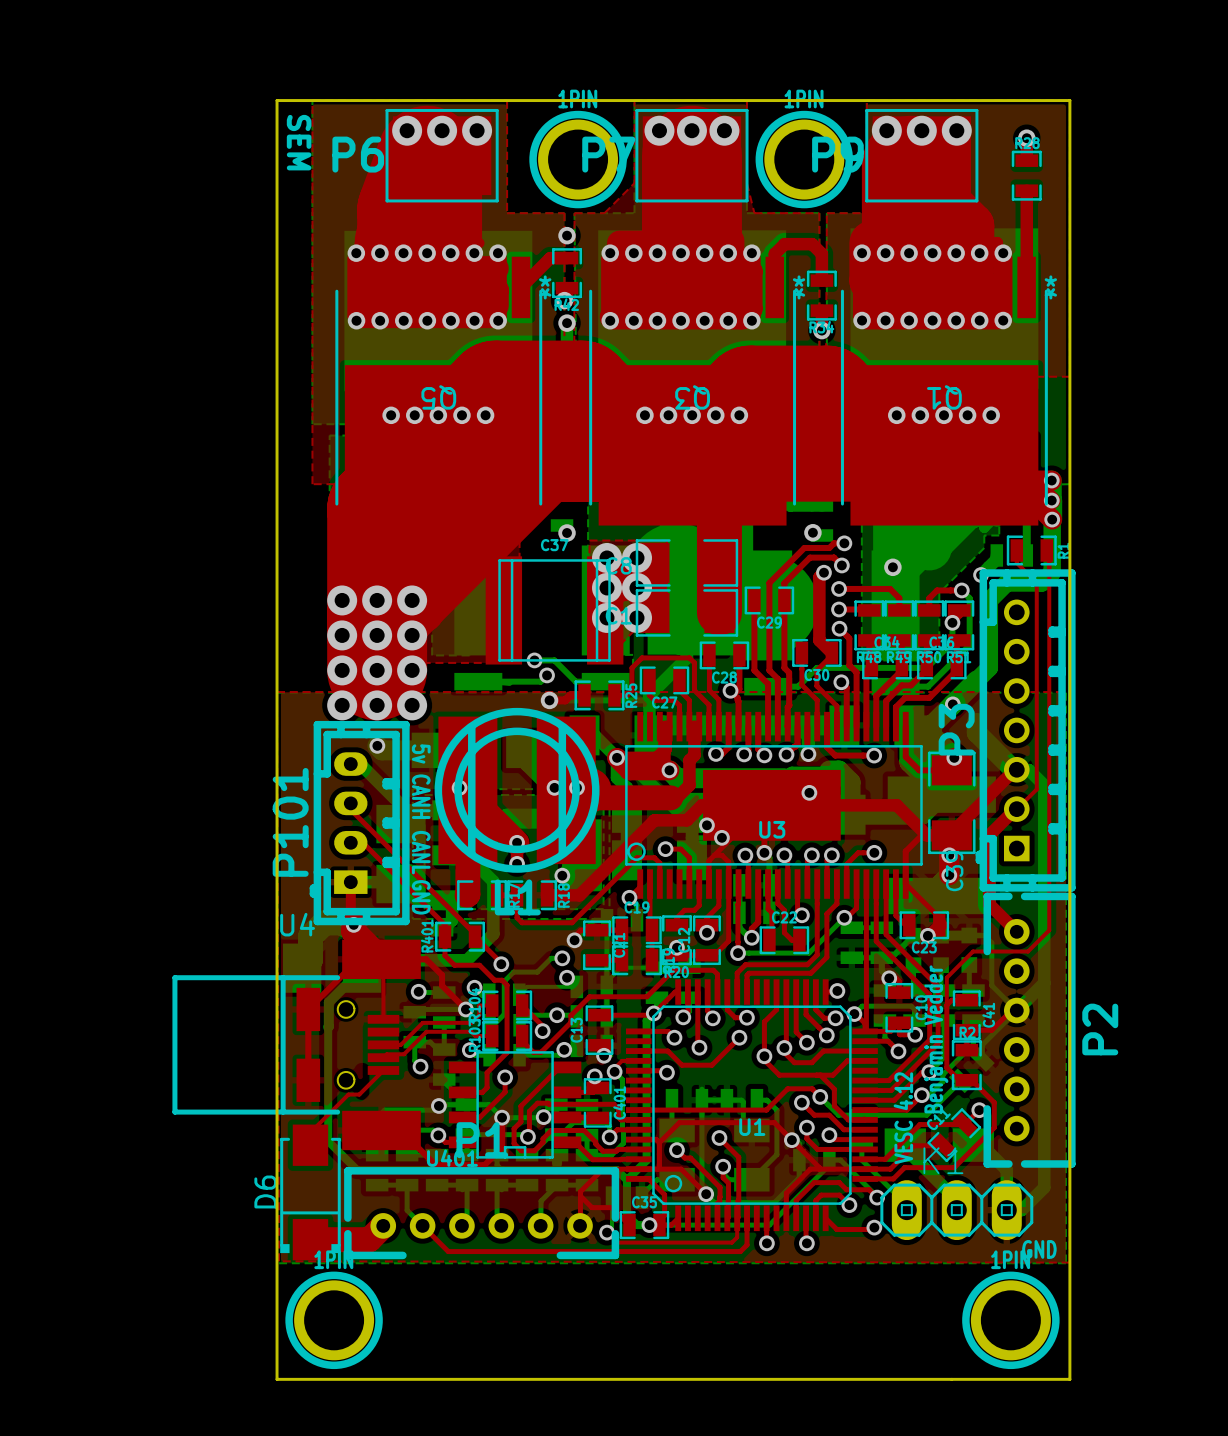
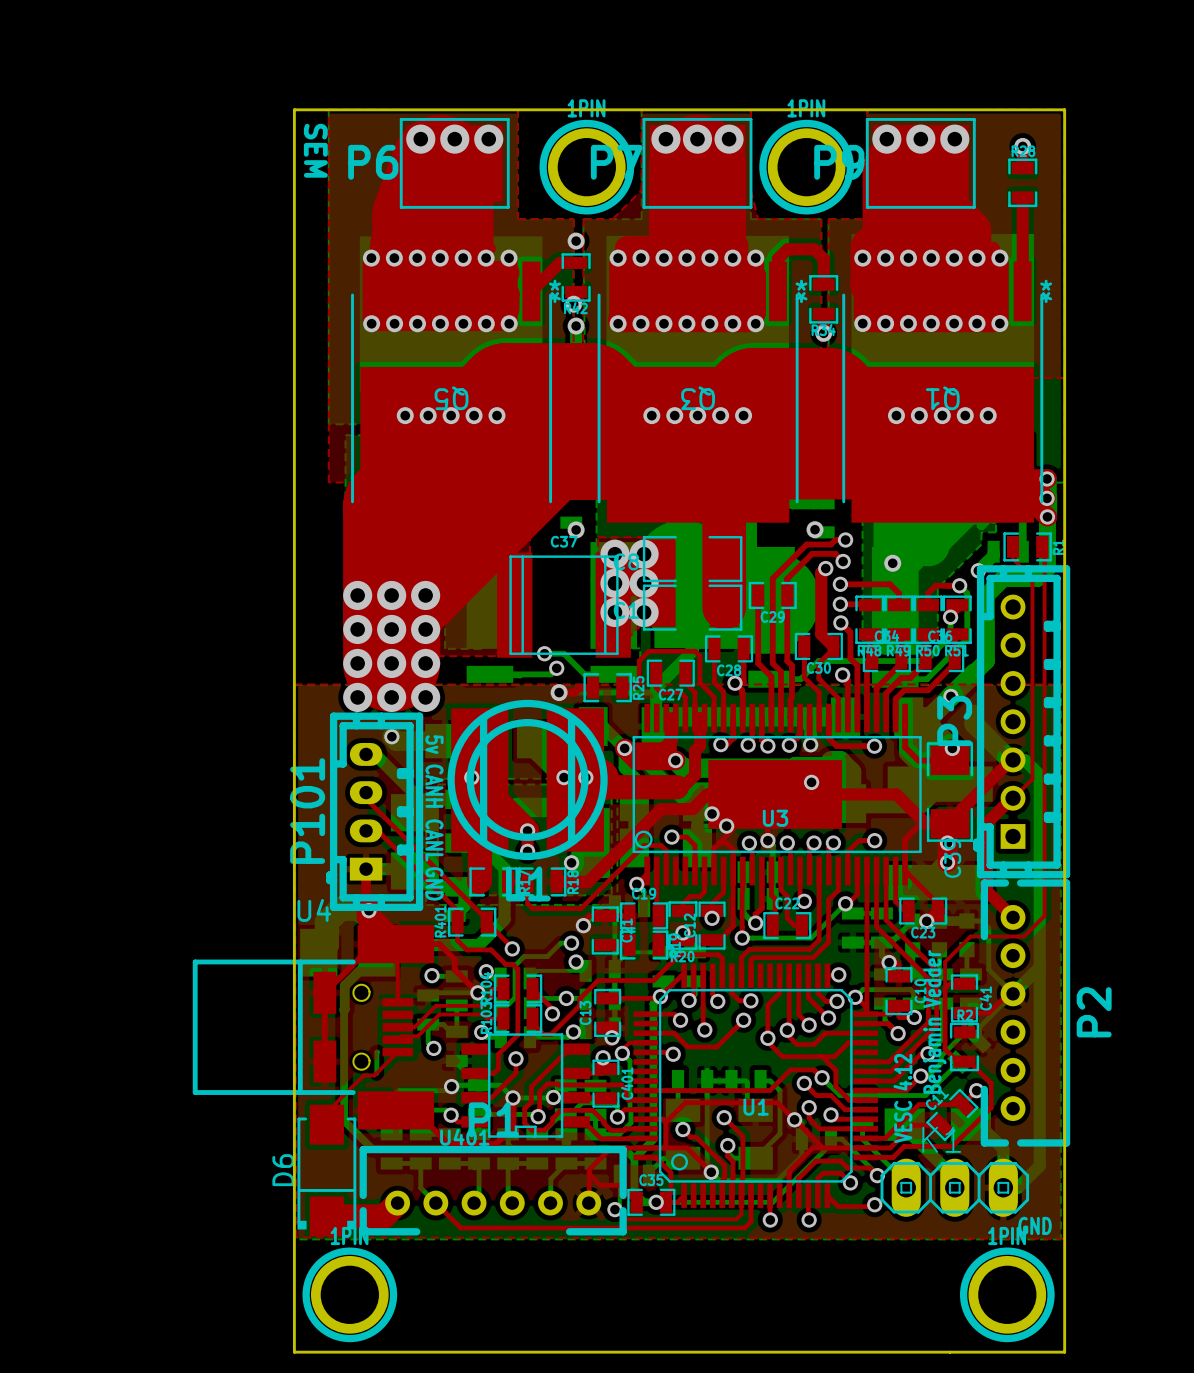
bottom track: none -> (377, 1052) (376, 1073)

